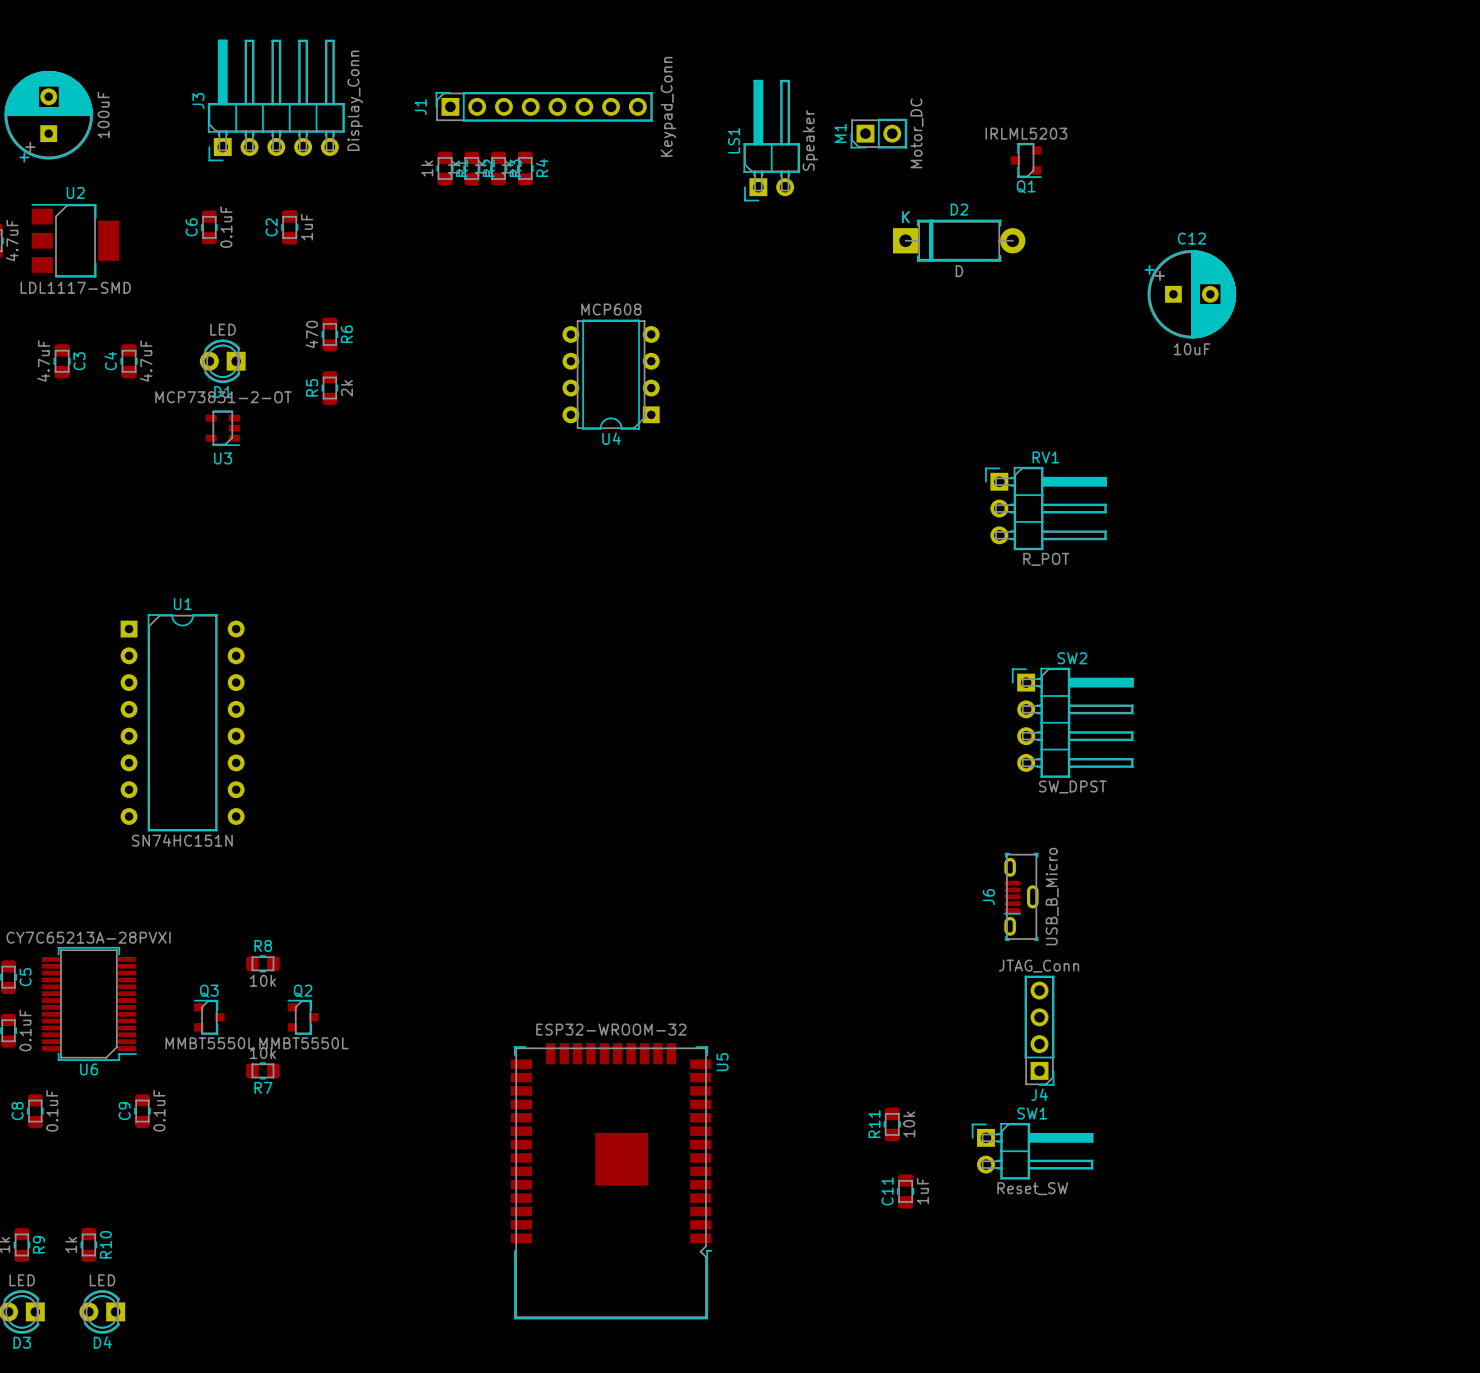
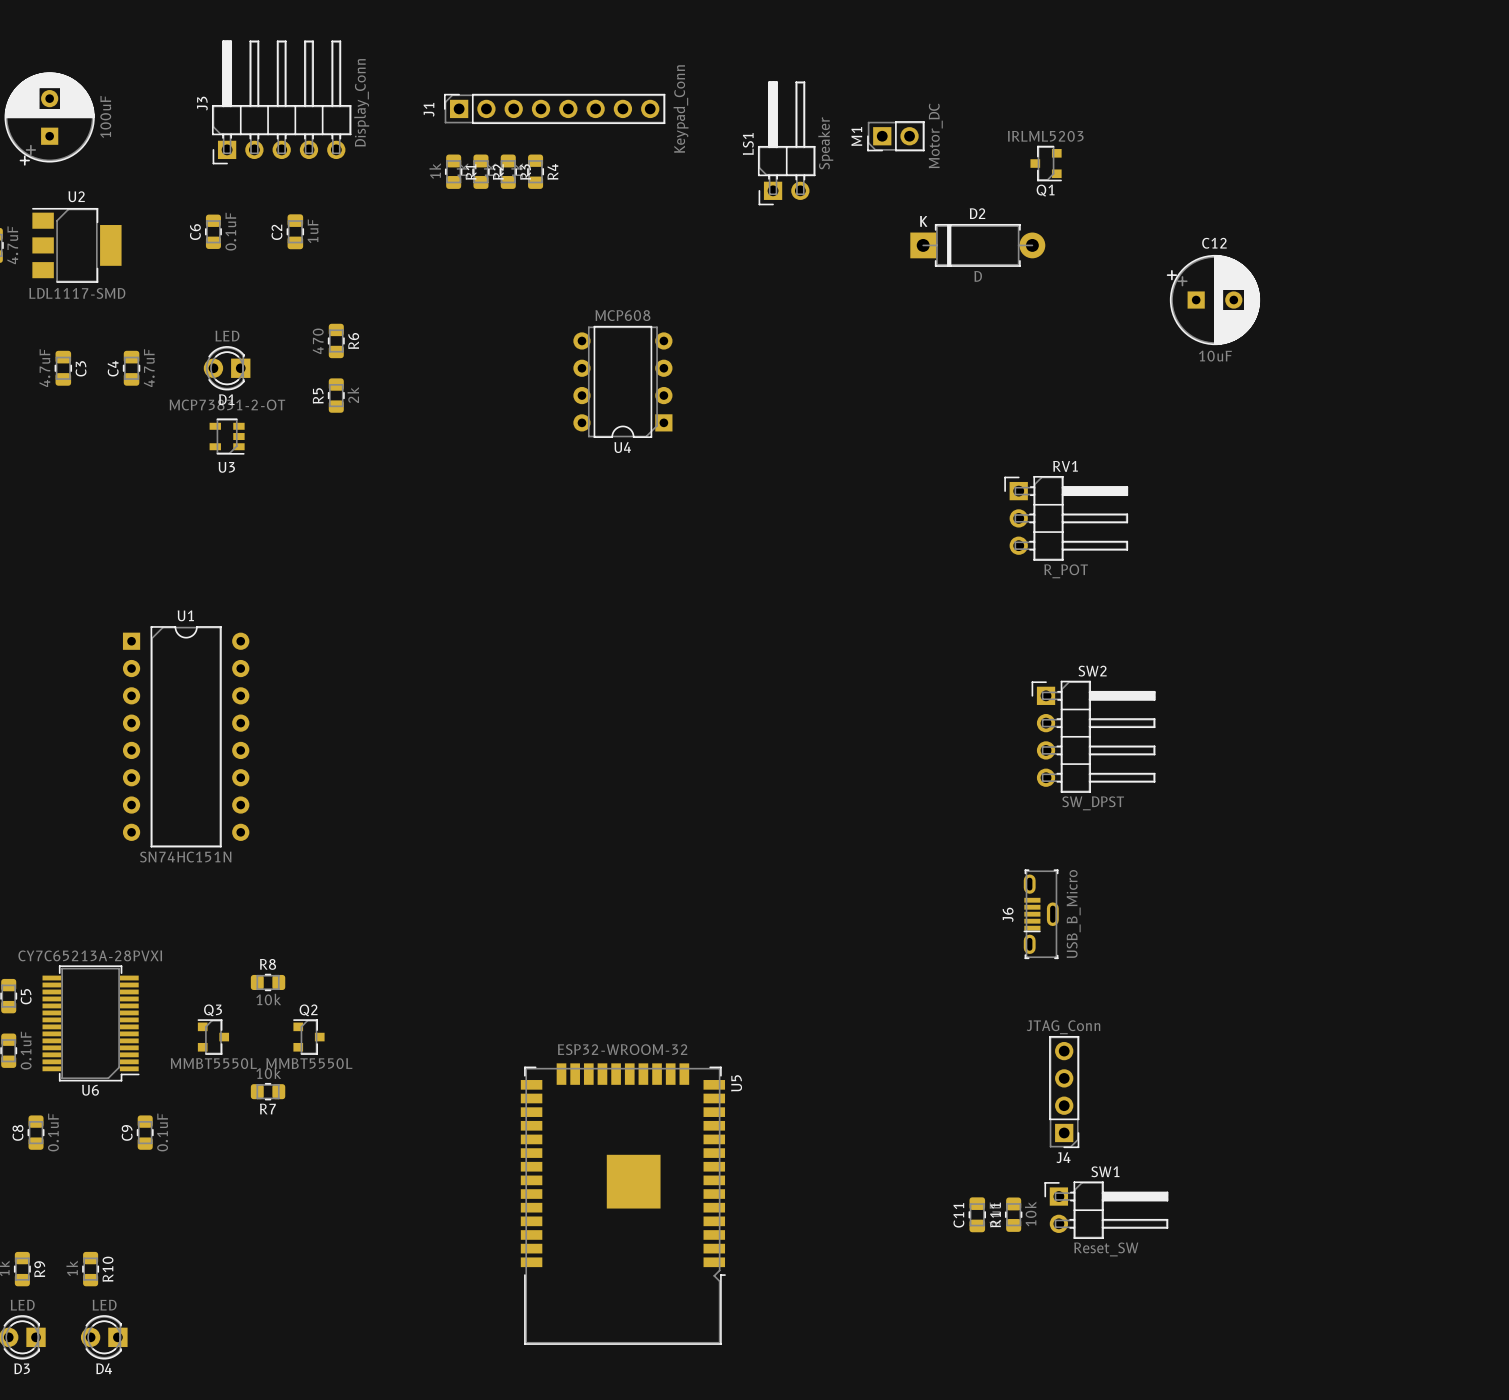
J4 position: (1039, 1030) -> (1064, 1092)
R11 position: (892, 1124) -> (1013, 1214)
SW1 position: (1032, 1151) -> (1106, 1210)
C11 position: (905, 1191) -> (977, 1214)

